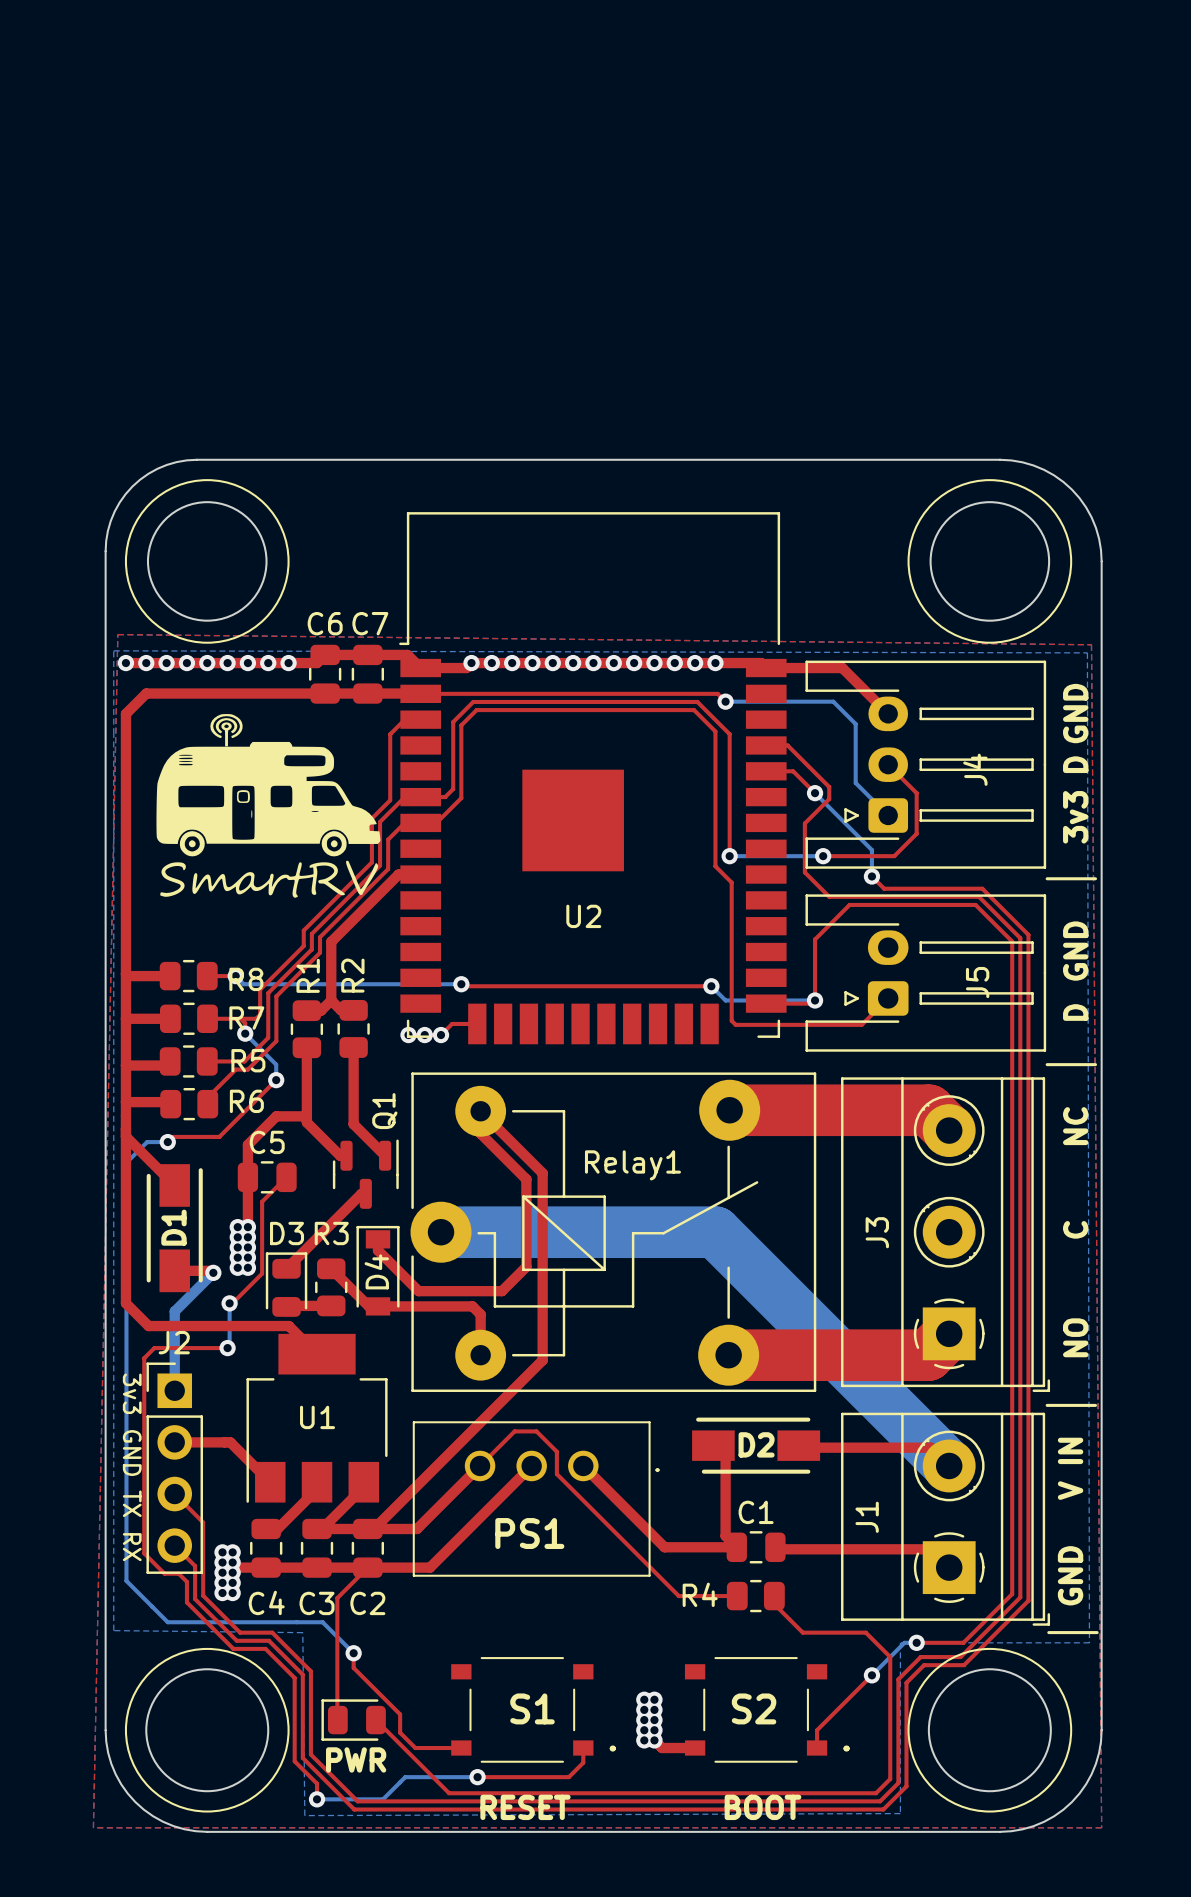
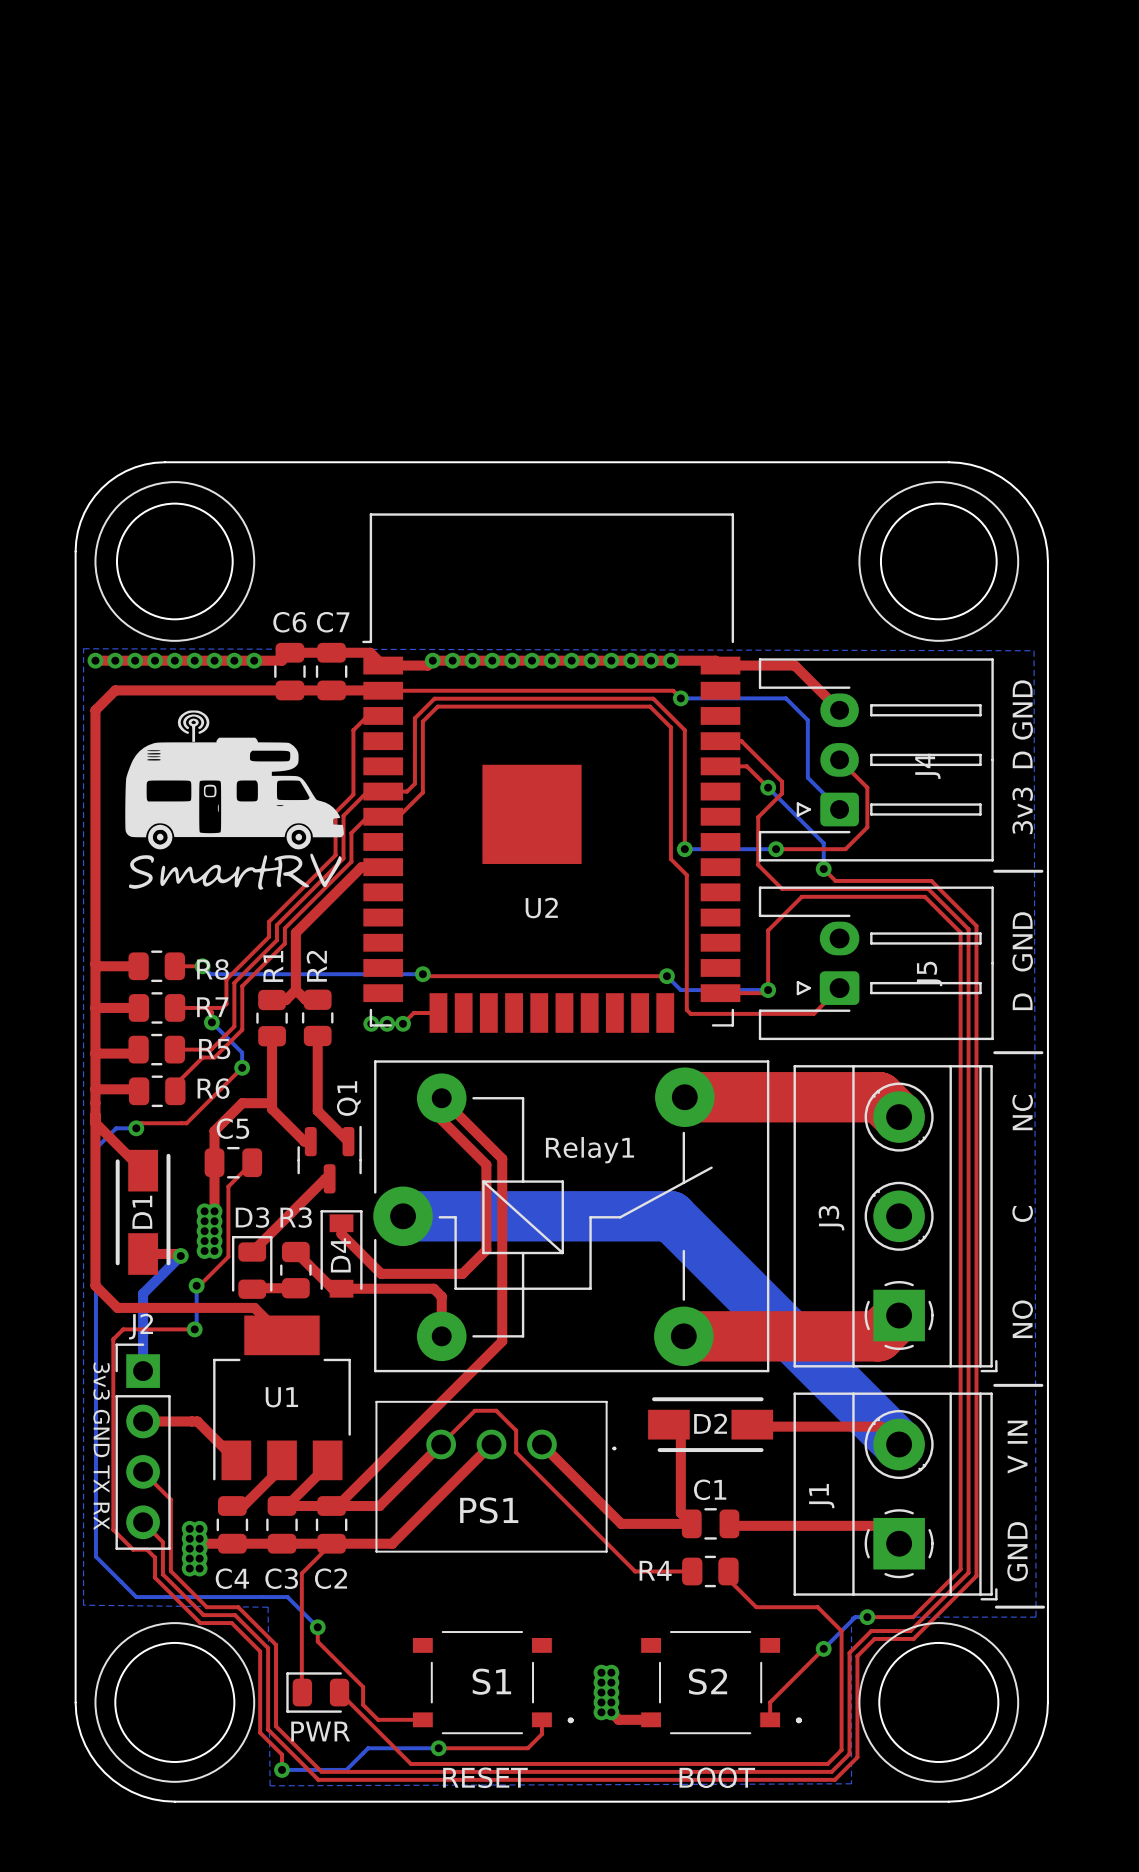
top zone outline: (117, 634) (93, 1827) (1101, 1827) (1091, 644) (117, 634) -> none

